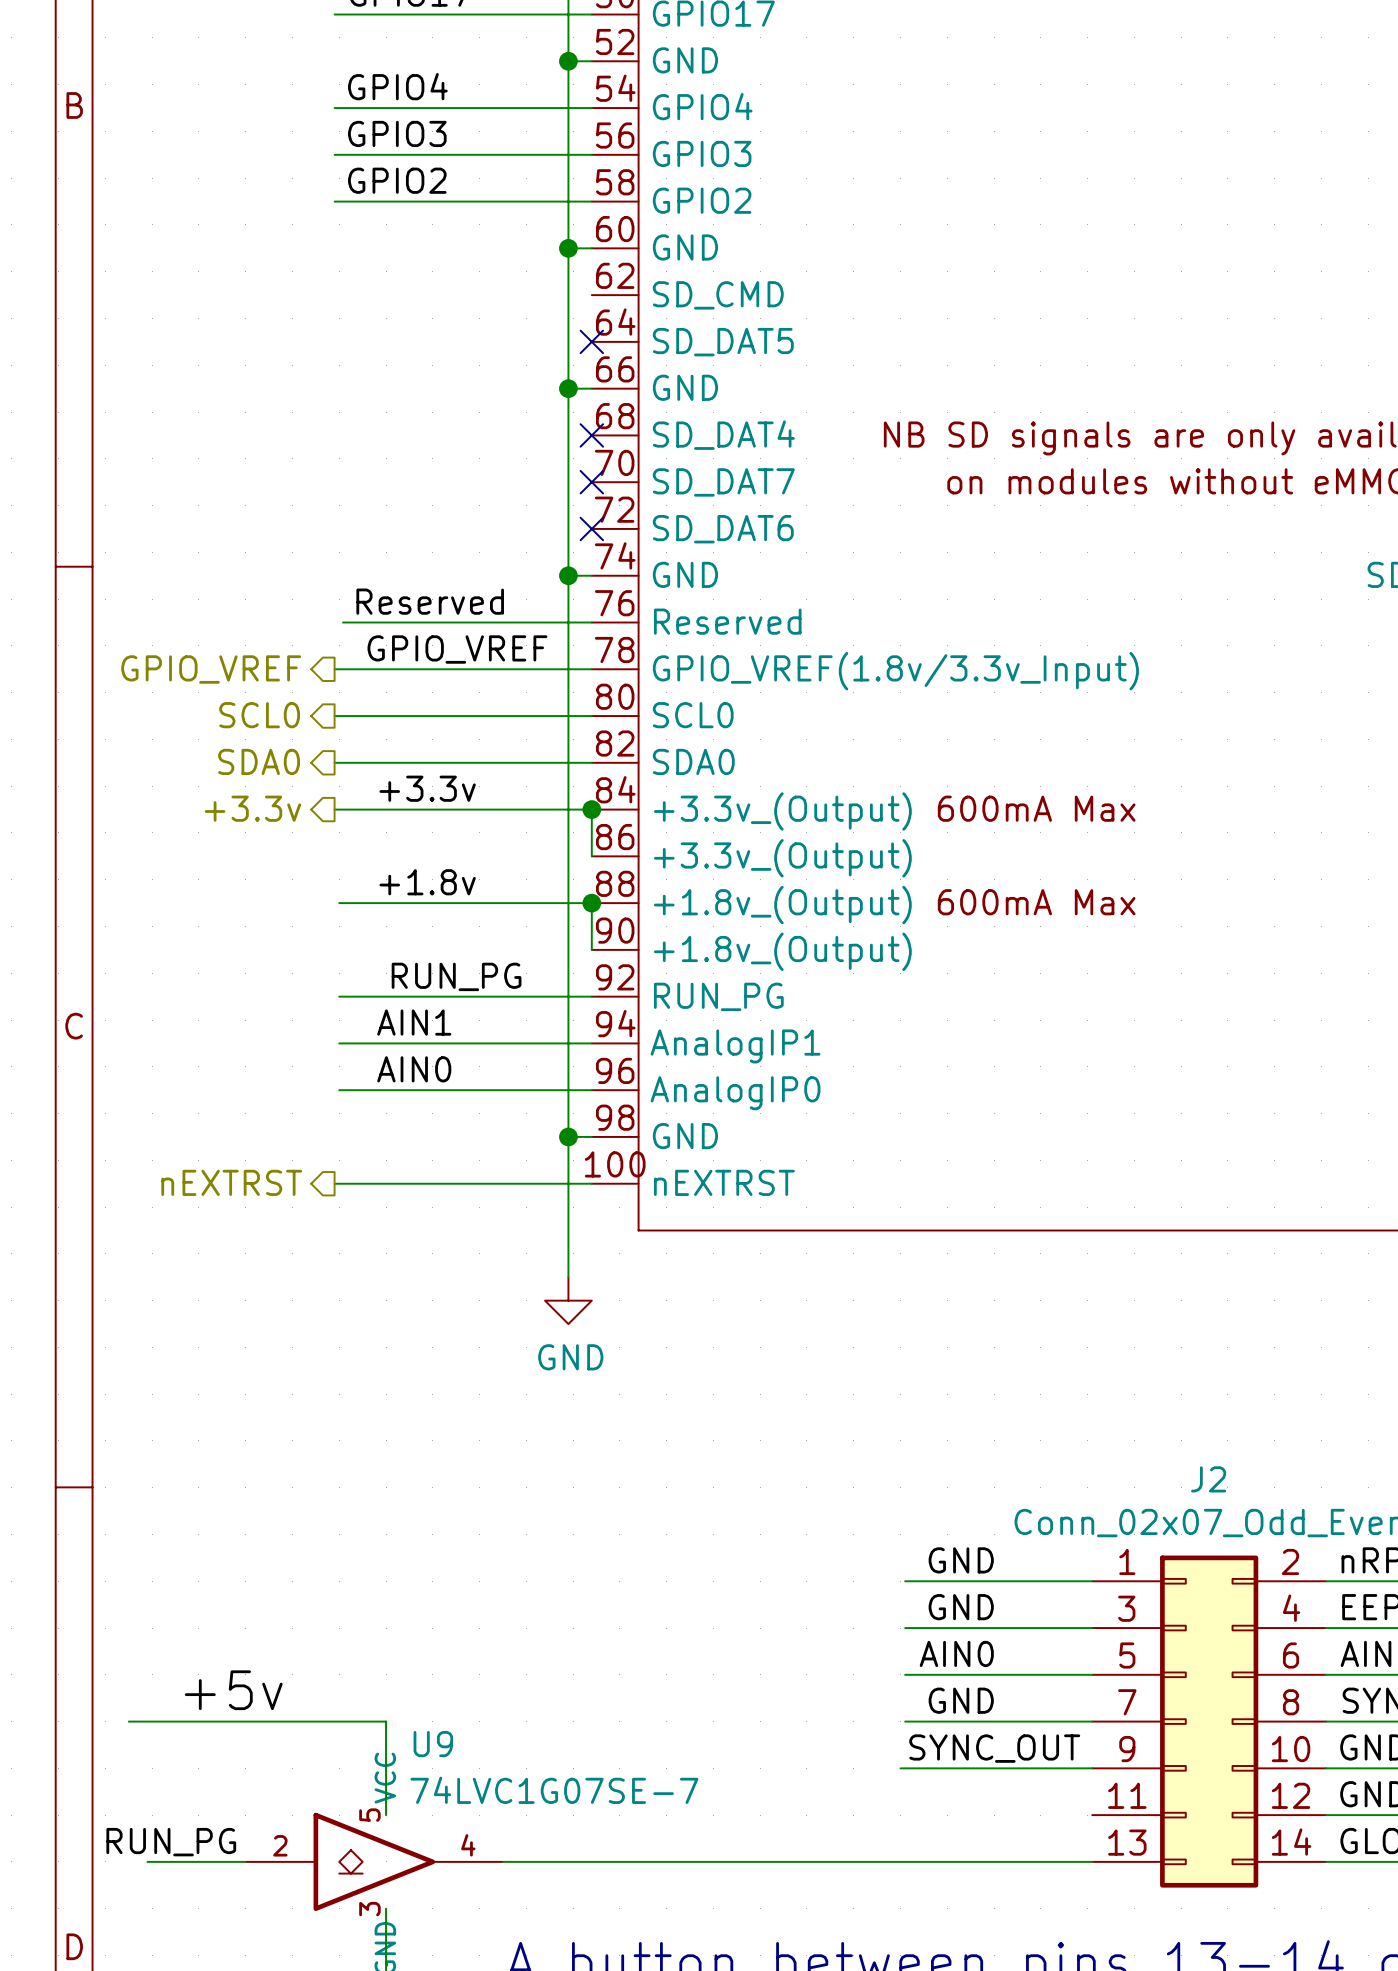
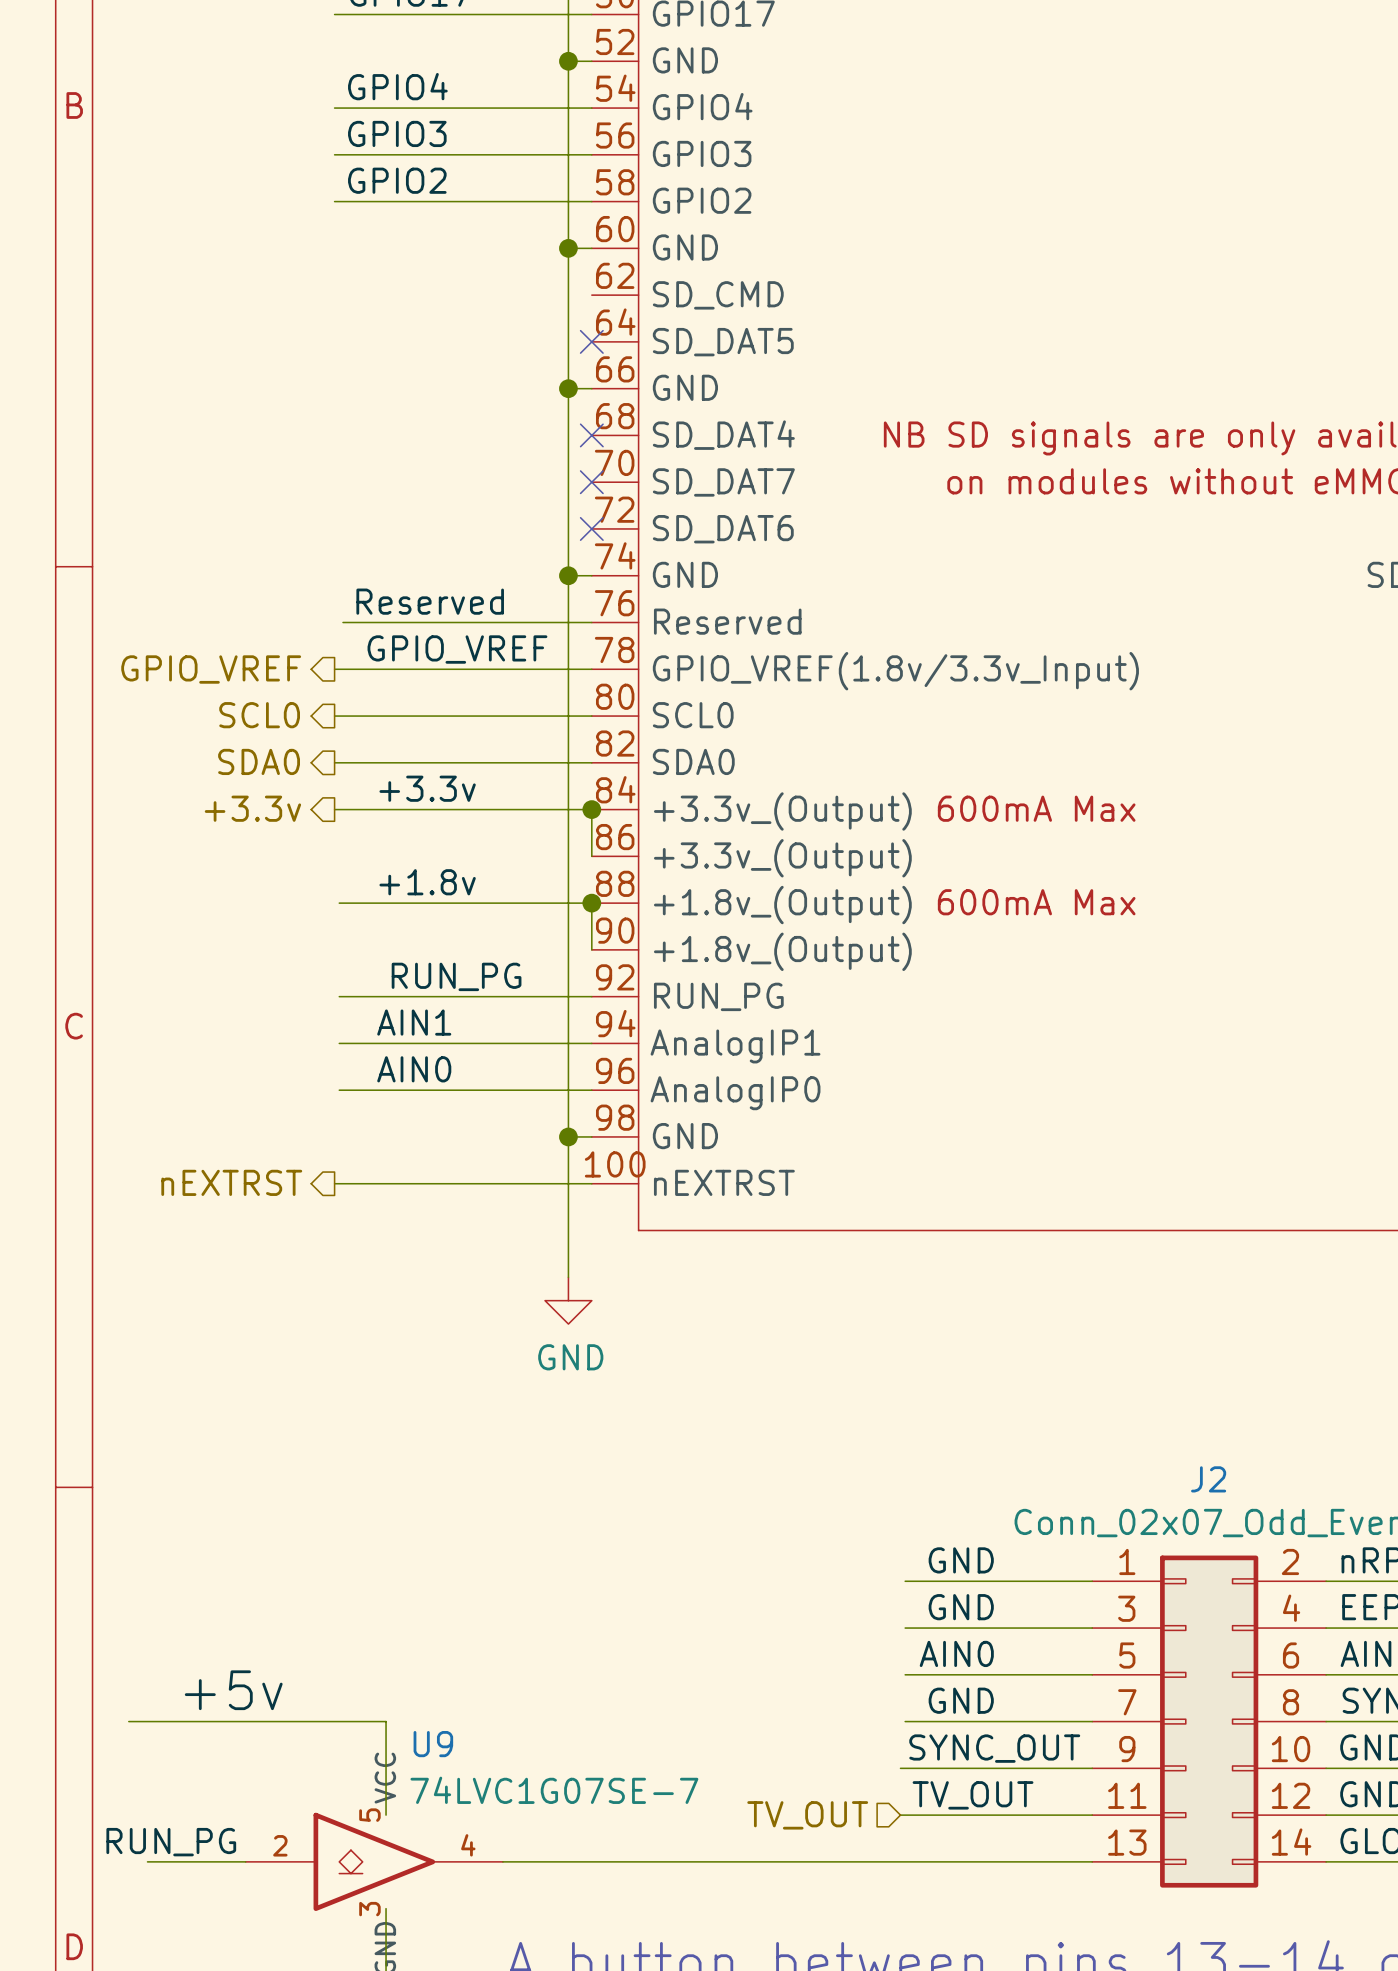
label: none -> TV_OUT (973, 1795)
hierarchical label: none -> TV_OUT (807, 1815)
wire: none -> (900, 1815) (1092, 1815)

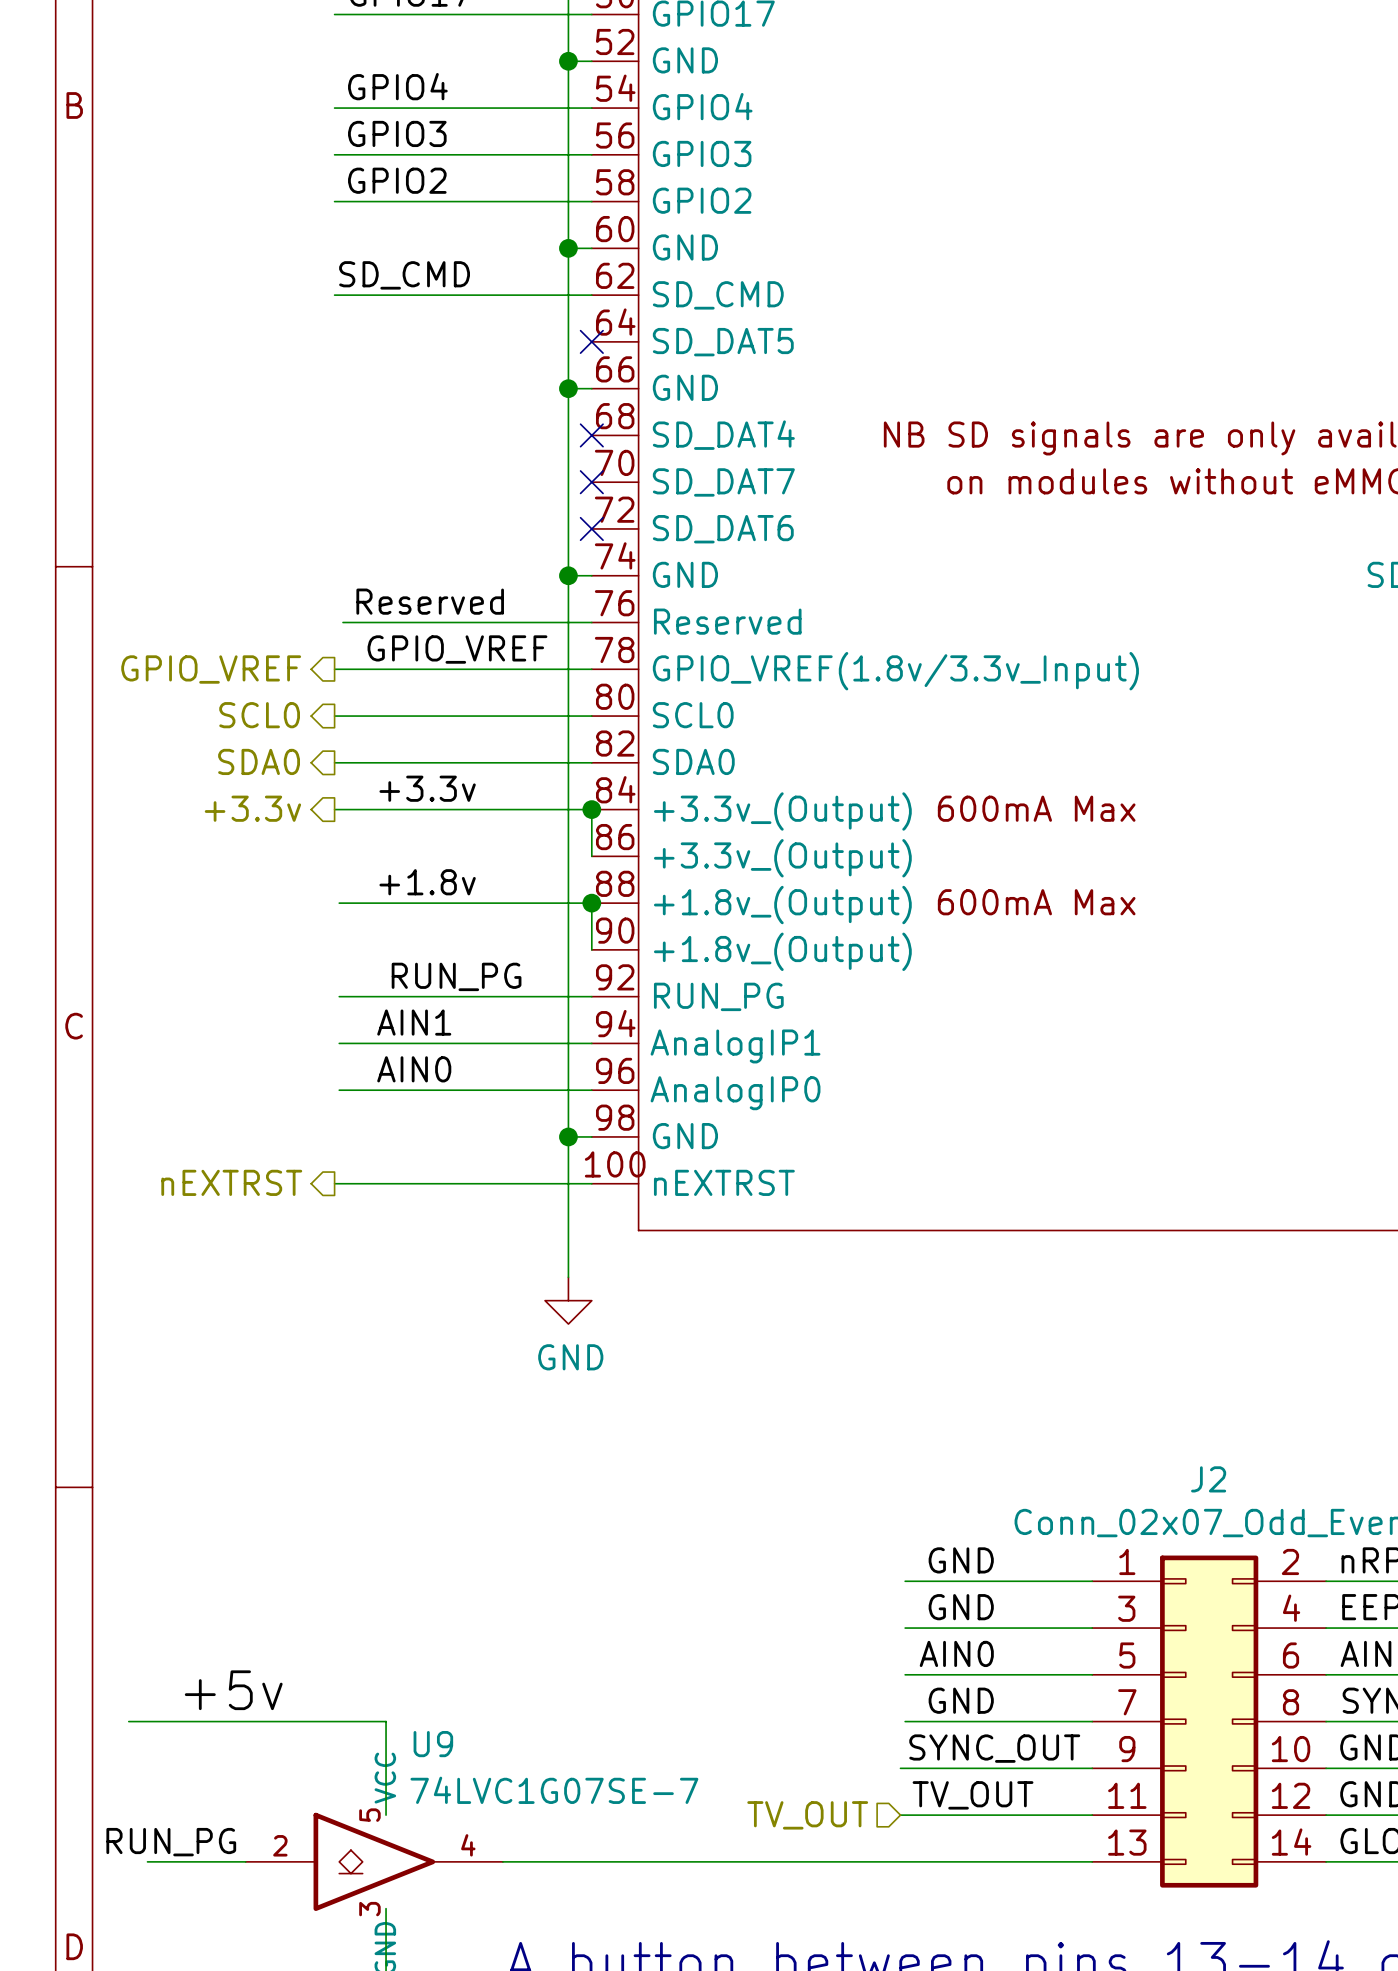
label: none -> SD_CMD (404, 275)
wire: none -> (334, 295) (591, 295)

